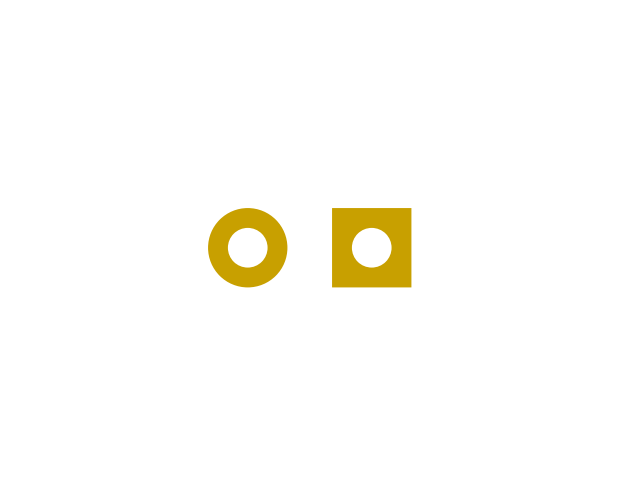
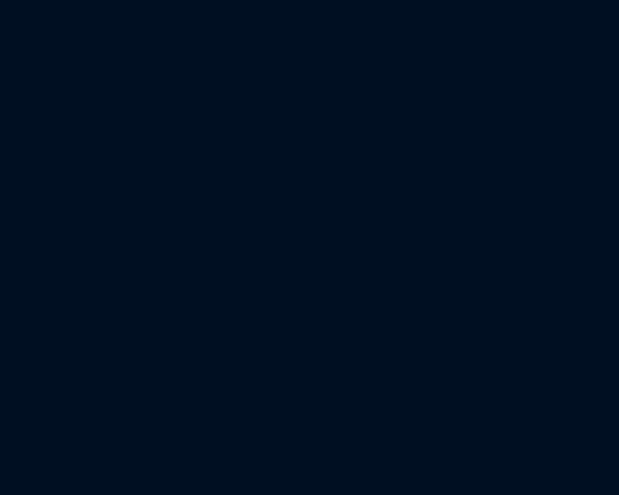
part: (309, 247) -> none

